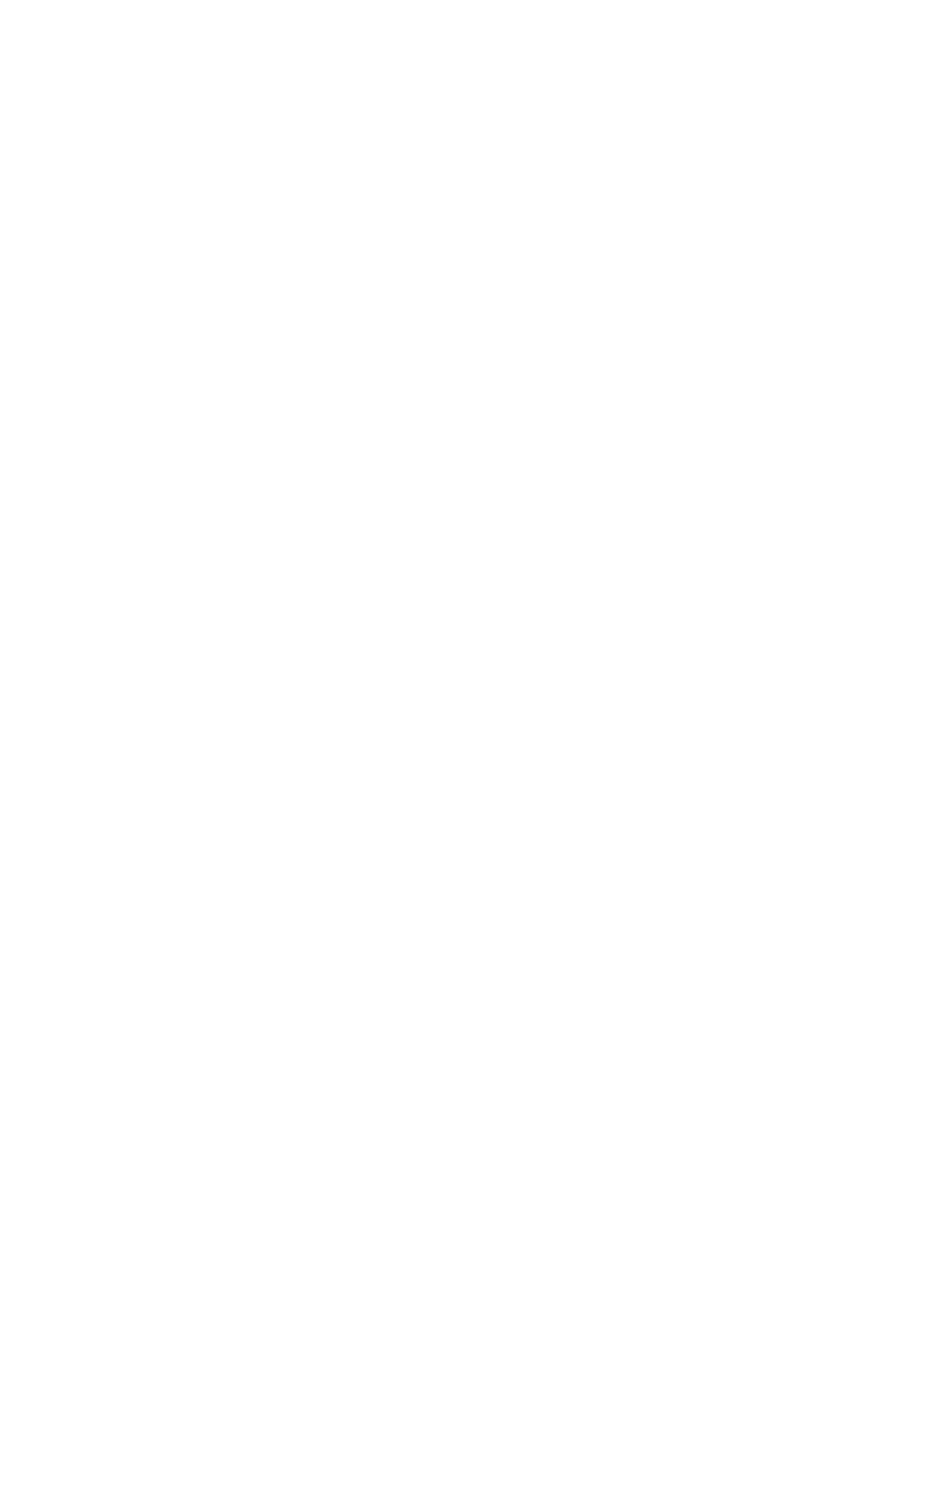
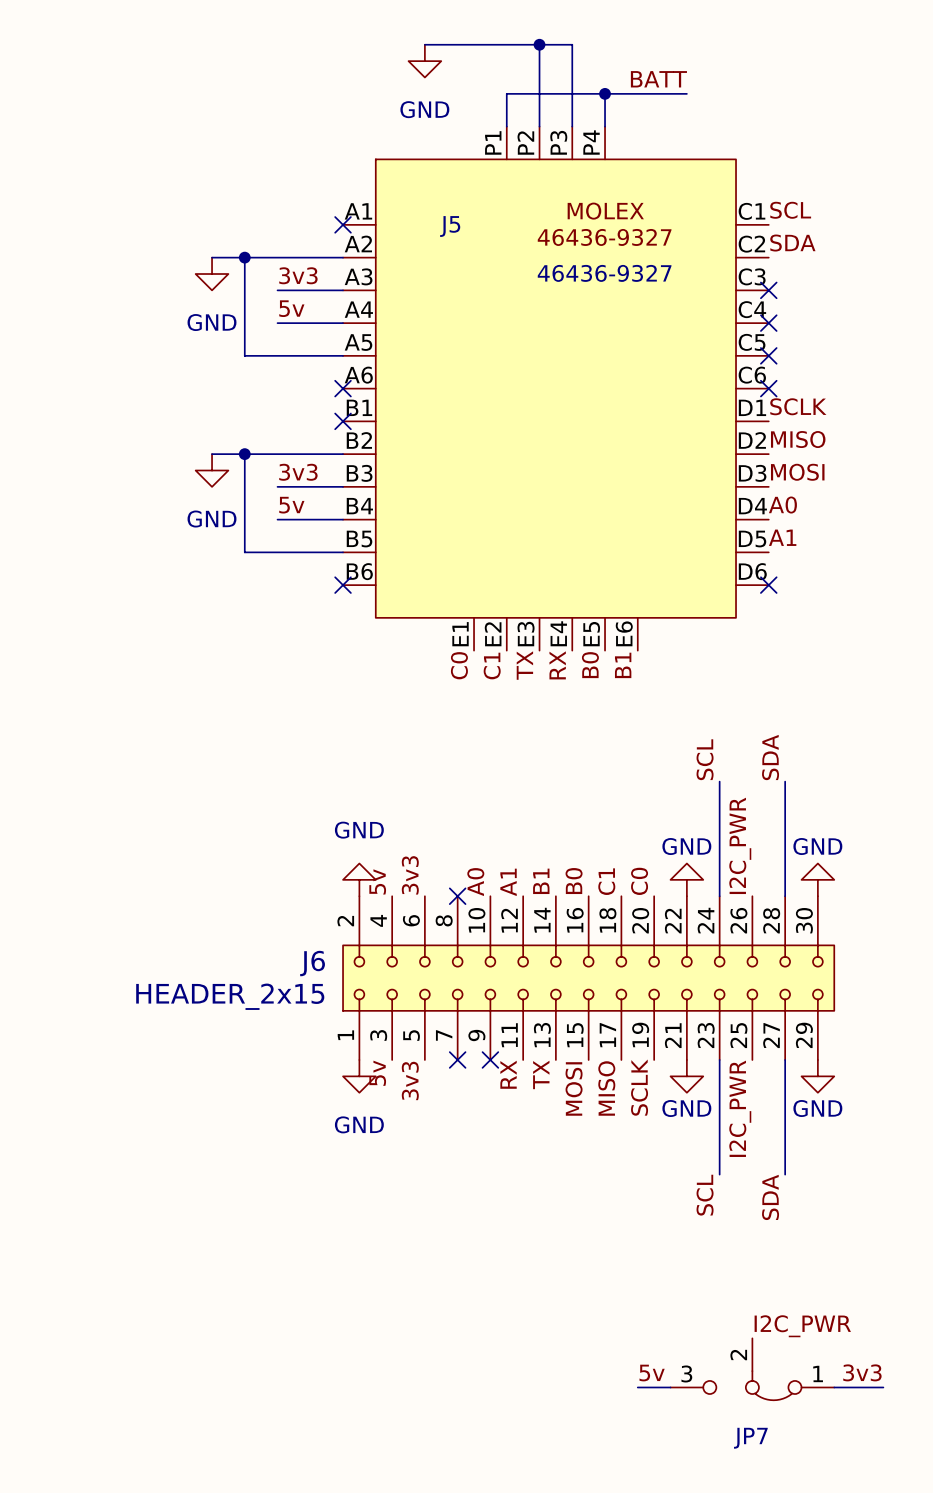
wire: none -> (424, 44) (572, 44) (572, 126)
wire: none -> (539, 44) (539, 126)
junction: none -> (539, 44)
power symbol: none -> GND (424, 61)
label: none -> BATT (658, 79)
wire: none -> (605, 93) (605, 126)
junction: none -> (605, 93)
wire: none -> (686, 93) (506, 93) (506, 126)
label: none -> SCL (790, 210)
no-connect mark: none -> (343, 224)
label: none -> SDA (792, 243)
wire: none -> (212, 257) (343, 257)
wire: none -> (244, 257) (244, 355) (343, 355)
junction: none -> (244, 257)
power symbol: none -> GND (212, 274)
label: none -> 3v3 (298, 275)
wire: none -> (277, 290) (343, 290)
no-connect mark: none -> (768, 290)
label: none -> 5v (291, 308)
wire: none -> (277, 323) (343, 323)
no-connect mark: none -> (768, 323)
no-connect mark: none -> (768, 355)
no-connect mark: none -> (343, 388)
J5: none -> 46436-9327 (555, 388)
no-connect mark: none -> (768, 388)
label: none -> SCLK (798, 406)
no-connect mark: none -> (343, 421)
label: none -> MISO (798, 439)
wire: none -> (212, 454) (343, 454)
wire: none -> (244, 454) (244, 552) (343, 552)
junction: none -> (244, 454)
power symbol: none -> GND (212, 470)
label: none -> 3v3 (298, 472)
label: none -> MOSI (797, 472)
wire: none -> (277, 486) (343, 486)
label: none -> 5v (291, 505)
label: none -> A0 (782, 505)
wire: none -> (277, 519) (343, 519)
label: none -> A1 (782, 537)
no-connect mark: none -> (343, 585)
no-connect mark: none -> (768, 585)
label: none -> TX (524, 665)
label: none -> C0 (459, 665)
label: none -> C1 (492, 666)
label: none -> RX (557, 665)
label: none -> B0 (590, 665)
label: none -> B1 (623, 665)
label: none -> SCL (705, 759)
label: none -> SDA (770, 757)
wire: none -> (719, 781) (719, 896)
wire: none -> (785, 781) (785, 896)
label: none -> I2C_PWR (740, 845)
label: none -> 3v3 (410, 875)
label: none -> B1 (541, 881)
label: none -> B0 (574, 881)
label: none -> C1 (606, 881)
label: none -> C0 (639, 881)
power symbol: none -> GND (359, 879)
power symbol: none -> GND (686, 879)
power symbol: none -> GND (817, 879)
label: none -> 5v (377, 881)
label: none -> A0 (475, 882)
label: none -> A1 (508, 882)
no-connect mark: none -> (457, 896)
J6: none -> HEADER_2x15 (588, 978)
no-connect mark: none -> (457, 1059)
no-connect mark: none -> (490, 1059)
wire: none -> (719, 1059) (719, 1174)
wire: none -> (785, 1059) (785, 1174)
label: none -> 5v (377, 1073)
label: none -> TX (541, 1074)
power symbol: none -> GND (359, 1076)
label: none -> RX (508, 1074)
power symbol: none -> GND (686, 1076)
power symbol: none -> GND (817, 1076)
label: none -> 3v3 (410, 1080)
label: none -> MOSI (574, 1088)
label: none -> MISO (606, 1088)
label: none -> SCLK (639, 1087)
label: none -> I2C_PWR (740, 1108)
label: none -> SCL (705, 1195)
label: none -> SDA (770, 1197)
label: none -> I2C_PWR (802, 1326)
JP7: none -> (752, 1369)
label: none -> 5v (652, 1373)
label: none -> 3v3 (862, 1372)
wire: none -> (637, 1387) (670, 1387)
wire: none -> (834, 1387) (883, 1387)

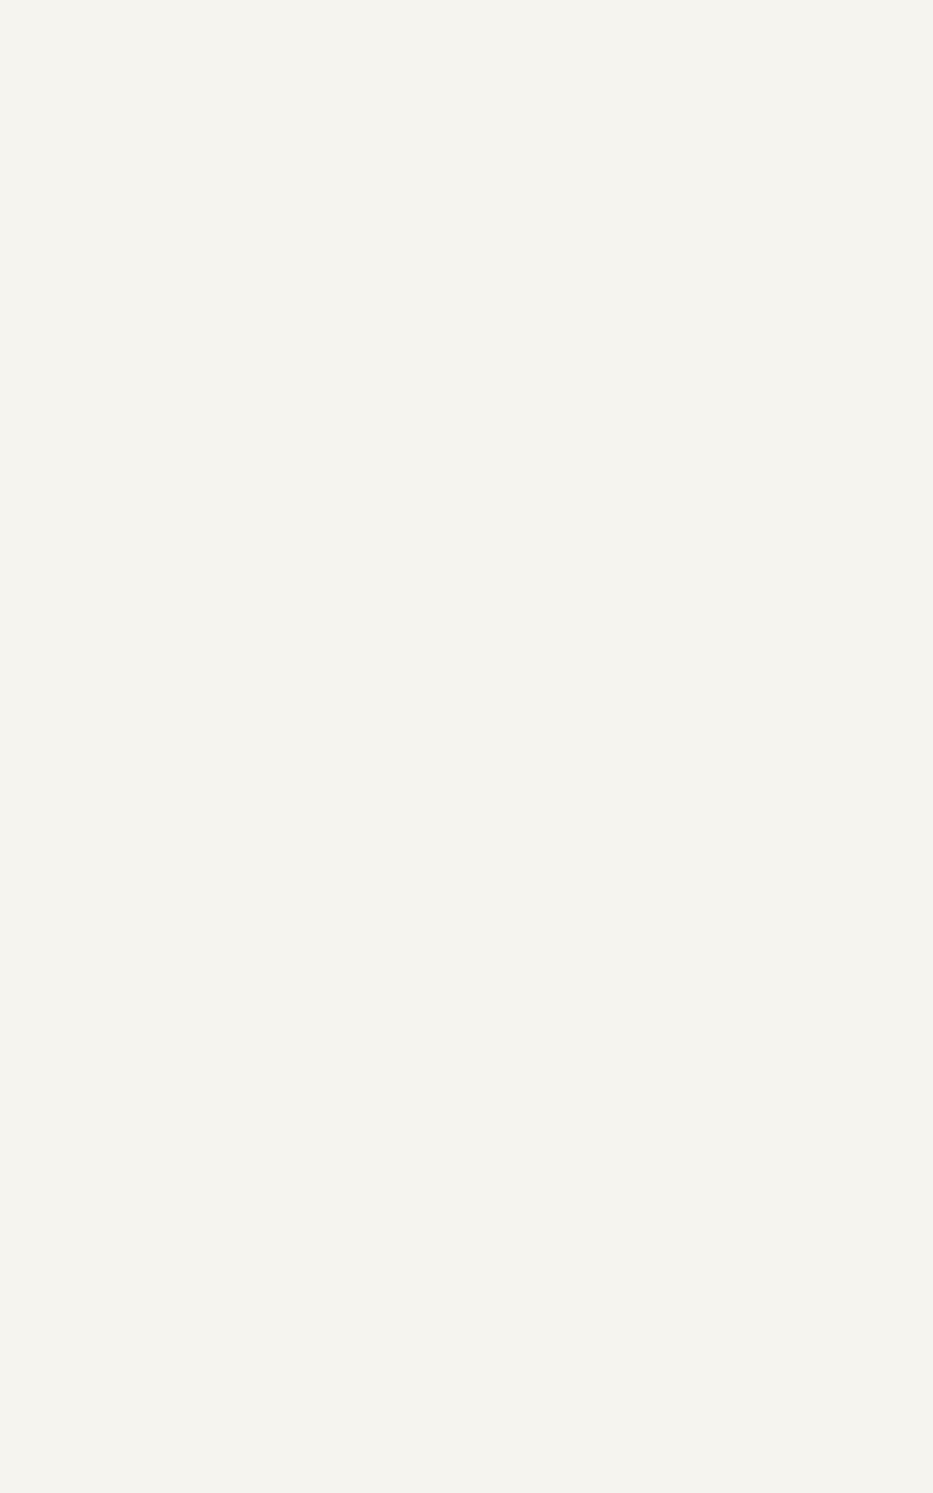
wire: (424, 44) (572, 44) (572, 126) -> none
wire: (539, 44) (539, 126) -> none
junction: (539, 44) -> none
power symbol: GND (424, 61) -> none
label: BATT (658, 79) -> none
wire: (605, 93) (605, 126) -> none
junction: (605, 93) -> none
wire: (686, 93) (506, 93) (506, 126) -> none
label: SCL (790, 210) -> none
no-connect mark: (343, 224) -> none
label: SDA (792, 243) -> none
wire: (212, 257) (343, 257) -> none
wire: (244, 257) (244, 355) (343, 355) -> none
junction: (244, 257) -> none
power symbol: GND (212, 274) -> none
label: 3v3 (298, 275) -> none
wire: (277, 290) (343, 290) -> none
no-connect mark: (768, 290) -> none
label: 5v (291, 308) -> none
wire: (277, 323) (343, 323) -> none
no-connect mark: (768, 323) -> none
no-connect mark: (768, 355) -> none
no-connect mark: (343, 388) -> none
J5: 46436-9327 (555, 388) -> none
no-connect mark: (768, 388) -> none
label: SCLK (798, 406) -> none
no-connect mark: (343, 421) -> none
label: MISO (798, 439) -> none
wire: (212, 454) (343, 454) -> none
wire: (244, 454) (244, 552) (343, 552) -> none
junction: (244, 454) -> none
power symbol: GND (212, 470) -> none
label: 3v3 (298, 472) -> none
label: MOSI (797, 472) -> none
wire: (277, 486) (343, 486) -> none
label: 5v (291, 505) -> none
label: A0 (782, 505) -> none
wire: (277, 519) (343, 519) -> none
label: A1 (782, 537) -> none
no-connect mark: (343, 585) -> none
no-connect mark: (768, 585) -> none
label: C0 (459, 665) -> none
label: TX (524, 665) -> none
label: RX (557, 665) -> none
label: B0 (590, 665) -> none
label: B1 (623, 665) -> none
label: C1 (492, 666) -> none
label: SDA (770, 757) -> none
label: SCL (705, 759) -> none
wire: (719, 781) (719, 896) -> none
wire: (785, 781) (785, 896) -> none
label: I2C_PWR (740, 845) -> none
label: 3v3 (410, 875) -> none
power symbol: GND (359, 879) -> none
power symbol: GND (686, 879) -> none
power symbol: GND (817, 879) -> none
label: 5v (377, 881) -> none
label: B1 (541, 881) -> none
label: B0 (574, 881) -> none
label: C1 (606, 881) -> none
label: C0 (639, 881) -> none
label: A0 (475, 882) -> none
label: A1 (508, 882) -> none
no-connect mark: (457, 896) -> none
J6: HEADER_2x15 (588, 978) -> none
no-connect mark: (457, 1059) -> none
no-connect mark: (490, 1059) -> none
wire: (719, 1059) (719, 1174) -> none
wire: (785, 1059) (785, 1174) -> none
label: 5v (377, 1073) -> none
label: RX (508, 1074) -> none
label: TX (541, 1074) -> none
power symbol: GND (359, 1076) -> none
power symbol: GND (686, 1076) -> none
power symbol: GND (817, 1076) -> none
label: 3v3 (410, 1080) -> none
label: SCLK (639, 1087) -> none
label: MOSI (574, 1088) -> none
label: MISO (606, 1088) -> none
label: I2C_PWR (740, 1108) -> none
label: SCL (705, 1195) -> none
label: SDA (770, 1197) -> none
label: I2C_PWR (802, 1326) -> none
JP7: (752, 1369) -> none
label: 3v3 (862, 1372) -> none
label: 5v (652, 1373) -> none
wire: (637, 1387) (670, 1387) -> none
wire: (834, 1387) (883, 1387) -> none

